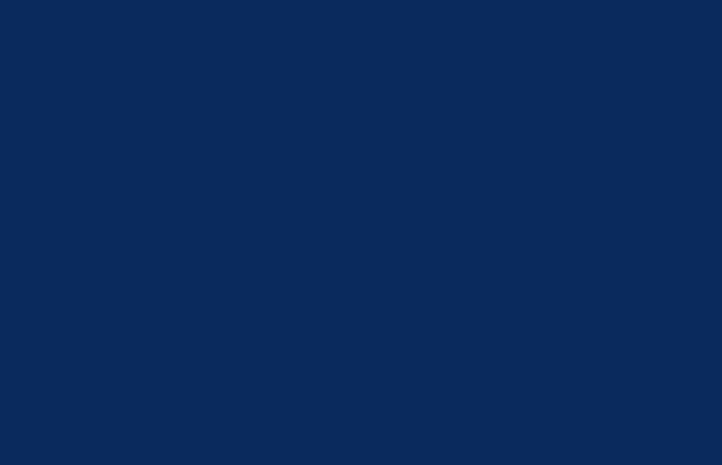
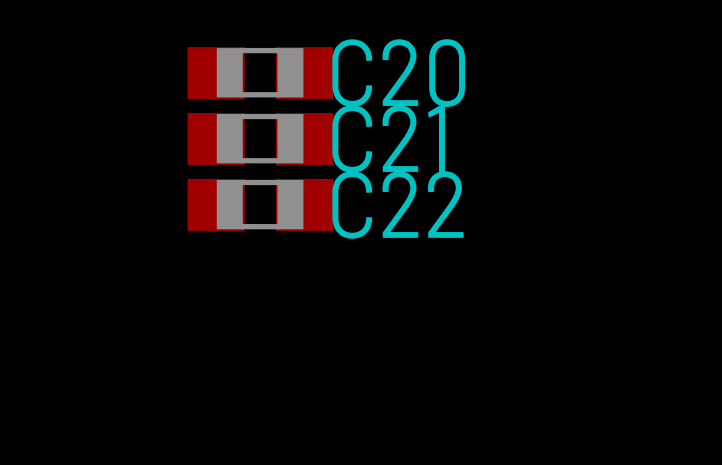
C20: none -> (260, 73)
C21: none -> (260, 138)
C22: none -> (260, 204)

